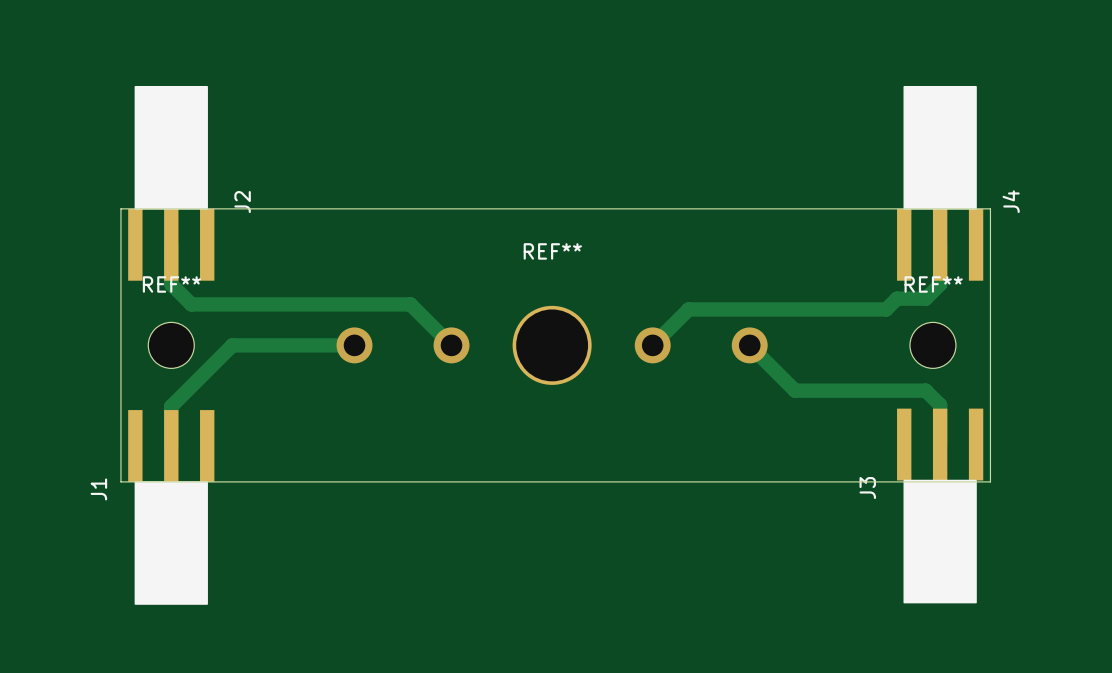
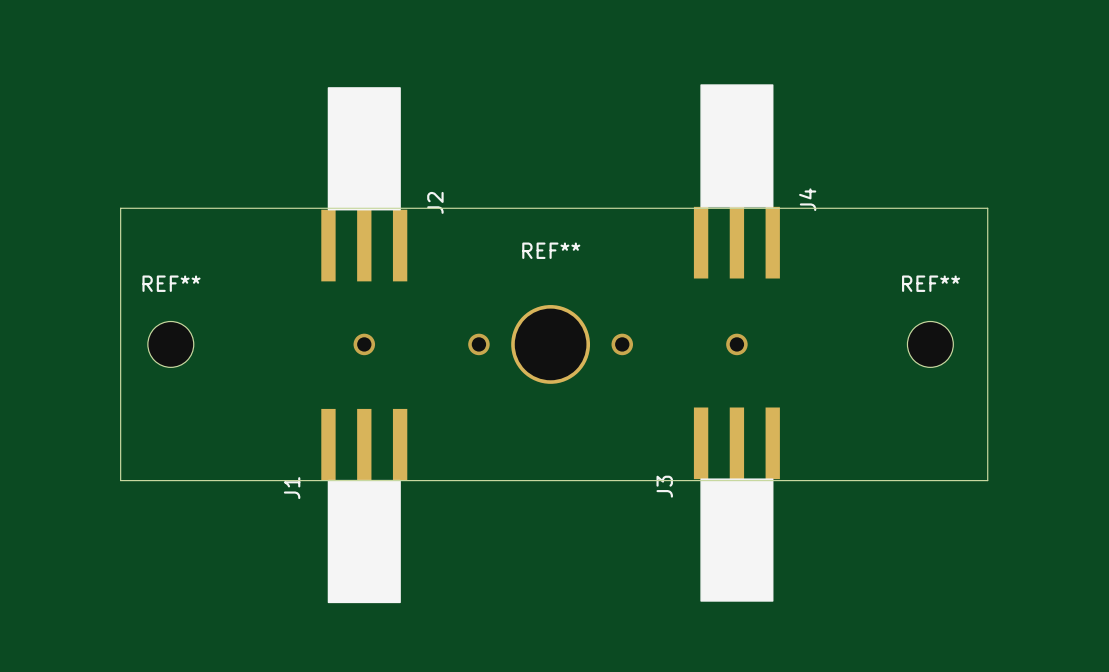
J2 position: (171, 183) -> (364, 184)
J4 position: (940, 183) -> (736, 181)
track: (171, 244) (171, 284) (191, 304) (410, 304) (451, 345) -> none
track: (940, 244) (940, 284) (925, 298) (897, 298) (886, 309) (688, 309) (652, 345) -> none
via size: [336, 327, 373, 364] -> [353, 333, 376, 356]
via size: [731, 327, 768, 364] -> [726, 333, 748, 356]
track: (354, 345) (232, 345) (171, 406) (171, 445) -> none
via: (451, 345) -> none
via: none -> (478, 344)
via: none -> (622, 344)
via: (652, 345) -> none
track: (749, 345) (795, 390) (925, 390) (940, 405) (940, 444) -> none
J3 position: (940, 505) -> (736, 504)
J1 position: (171, 507) -> (364, 506)

